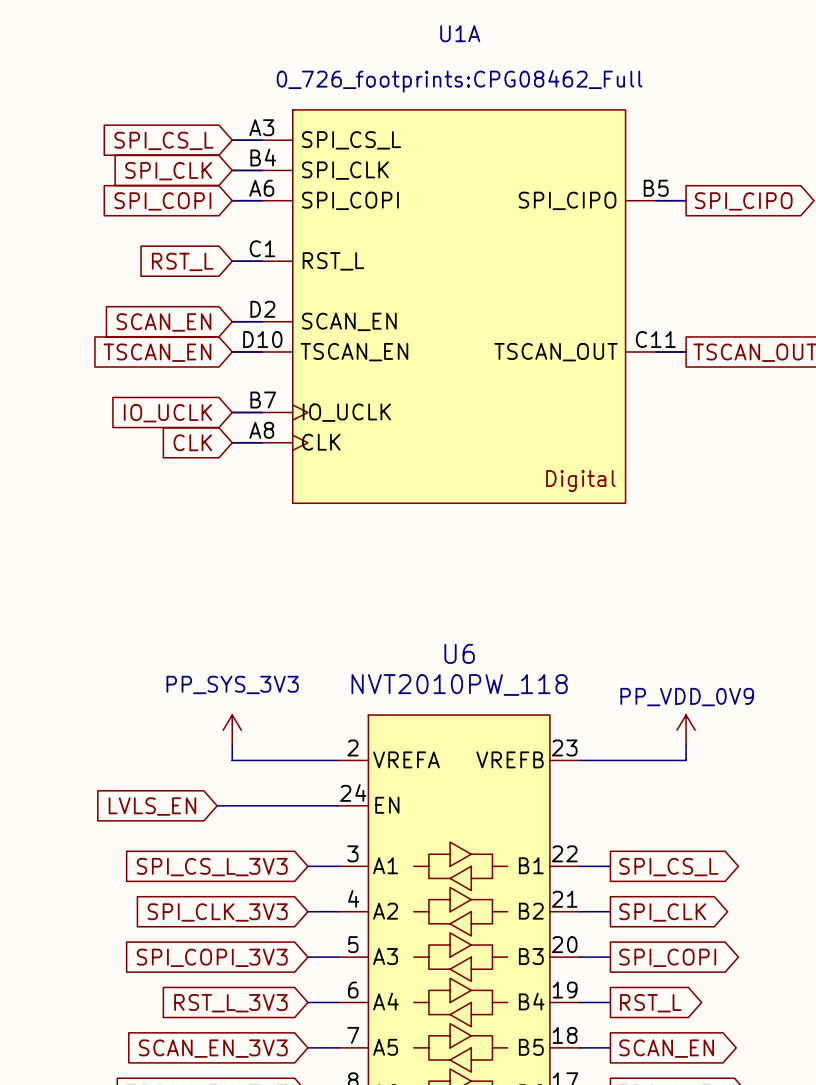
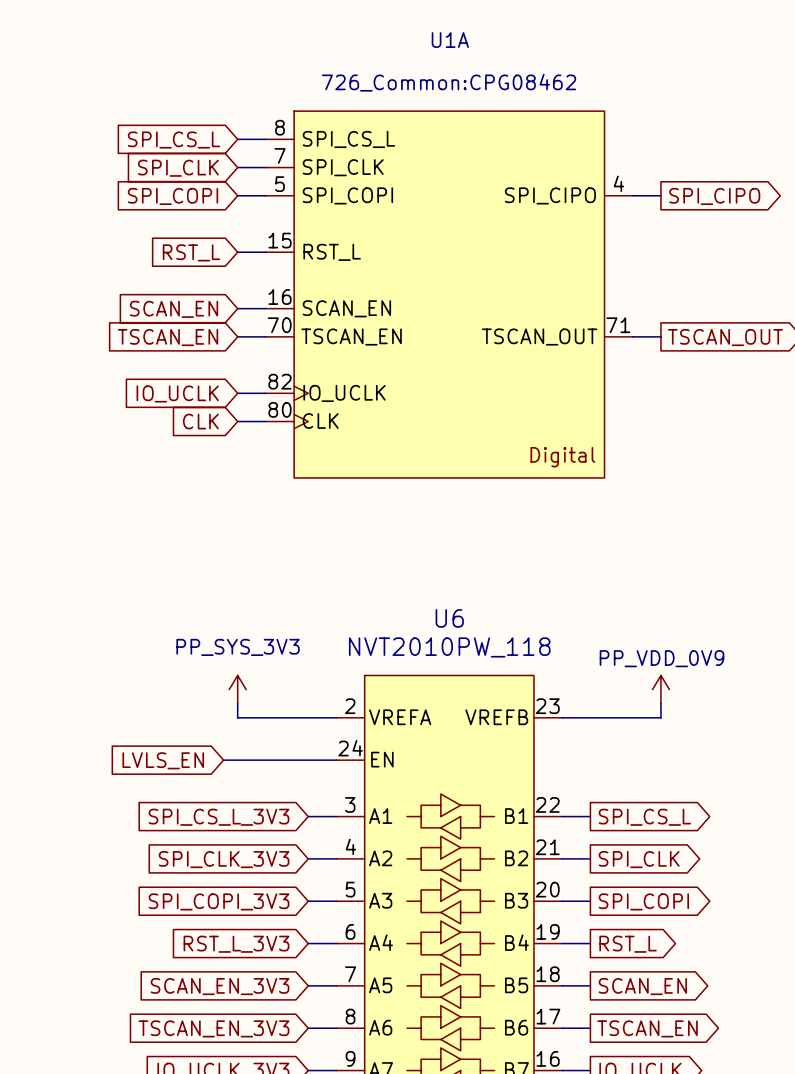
U1A text: 0_726_footprints:CPG08462_Full (459, 81) -> 726_Common:CPG08462 (448, 82)
U1A symbol: [232, 109, 687, 504] -> [265, 111, 633, 478]

